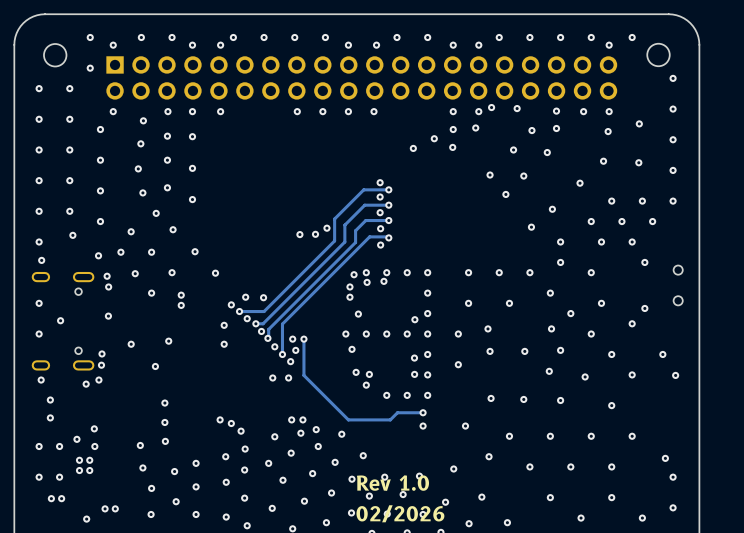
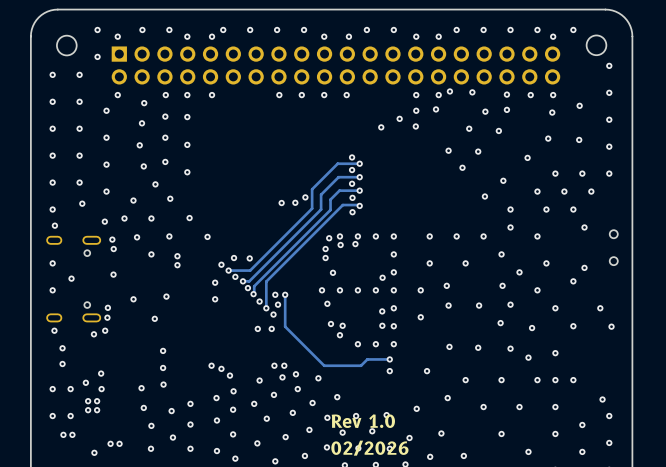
via: none -> (528, 357)
via: none -> (555, 380)
via: none -> (582, 424)

